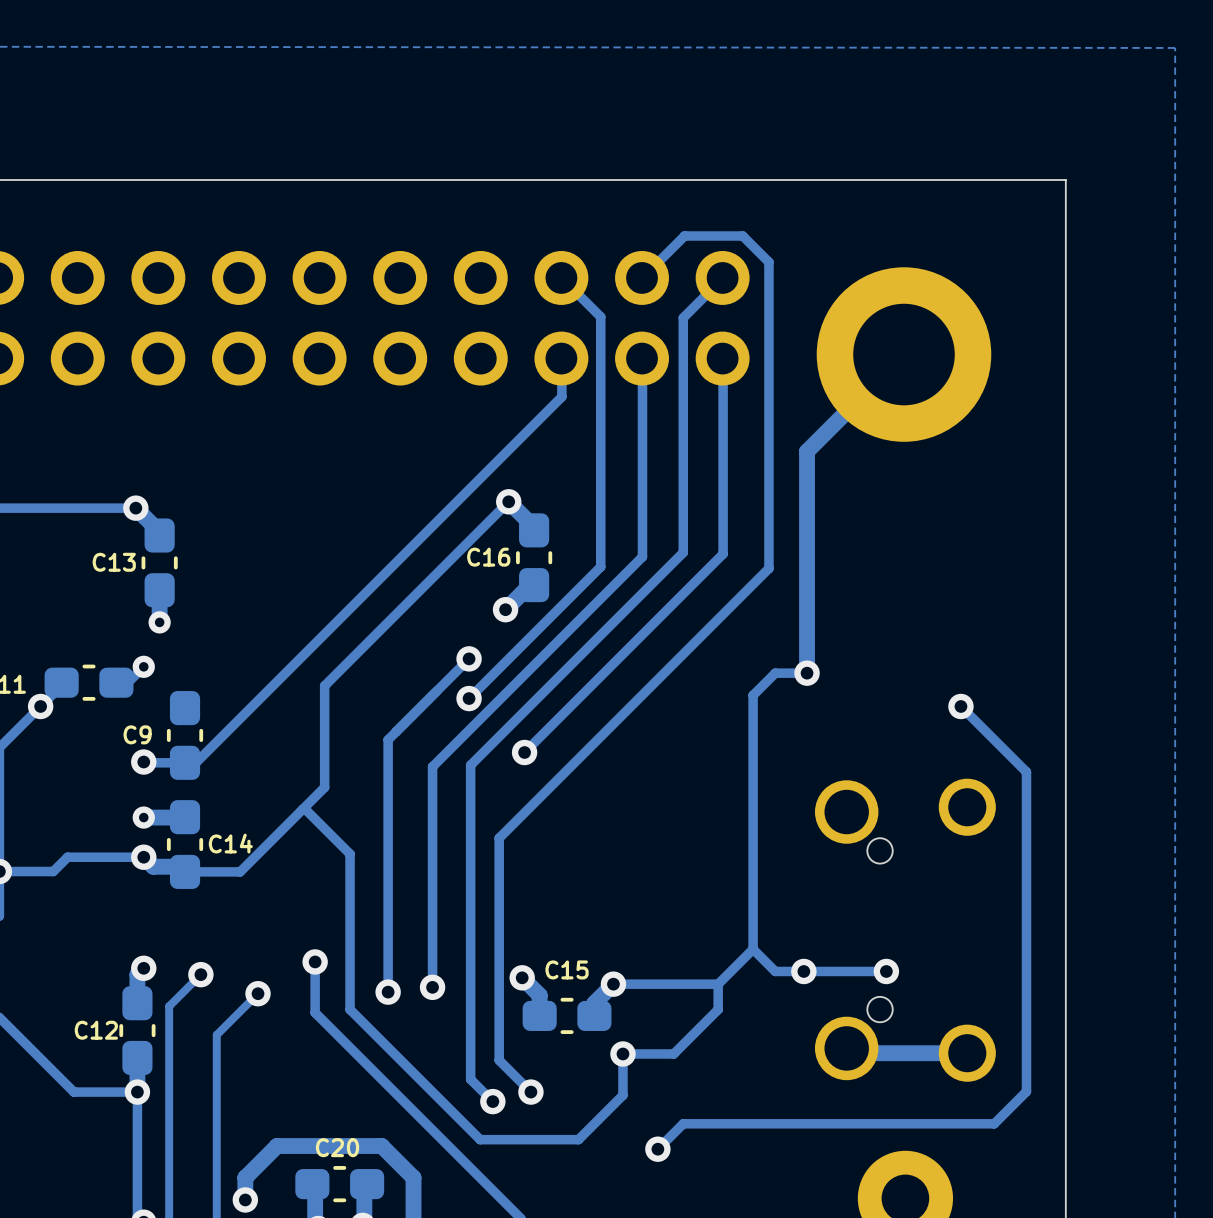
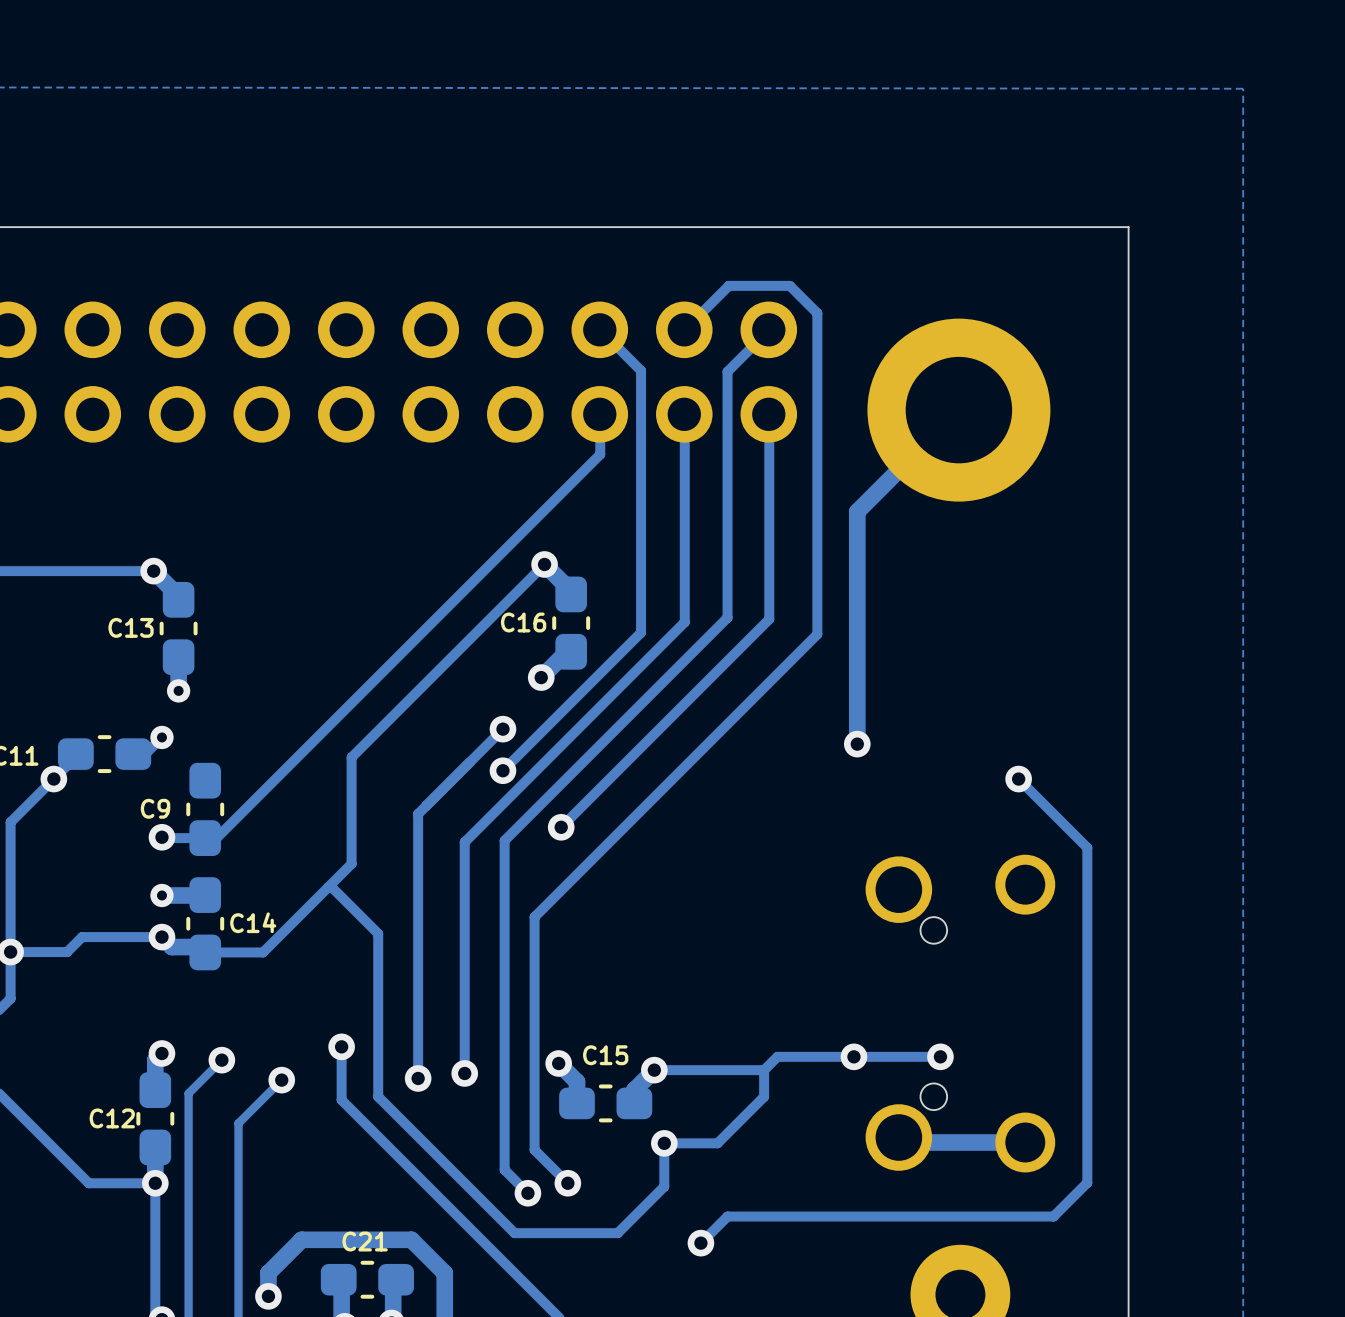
track: (807, 673) (775, 673) (753, 695) (753, 949) -> none
track: (753, 949) (730, 971) -> (824, 1056) (777, 1056)
track: (753, 949) (775, 971) -> none
C20 name: C20 (337, 1147) -> C21 (365, 1241)

